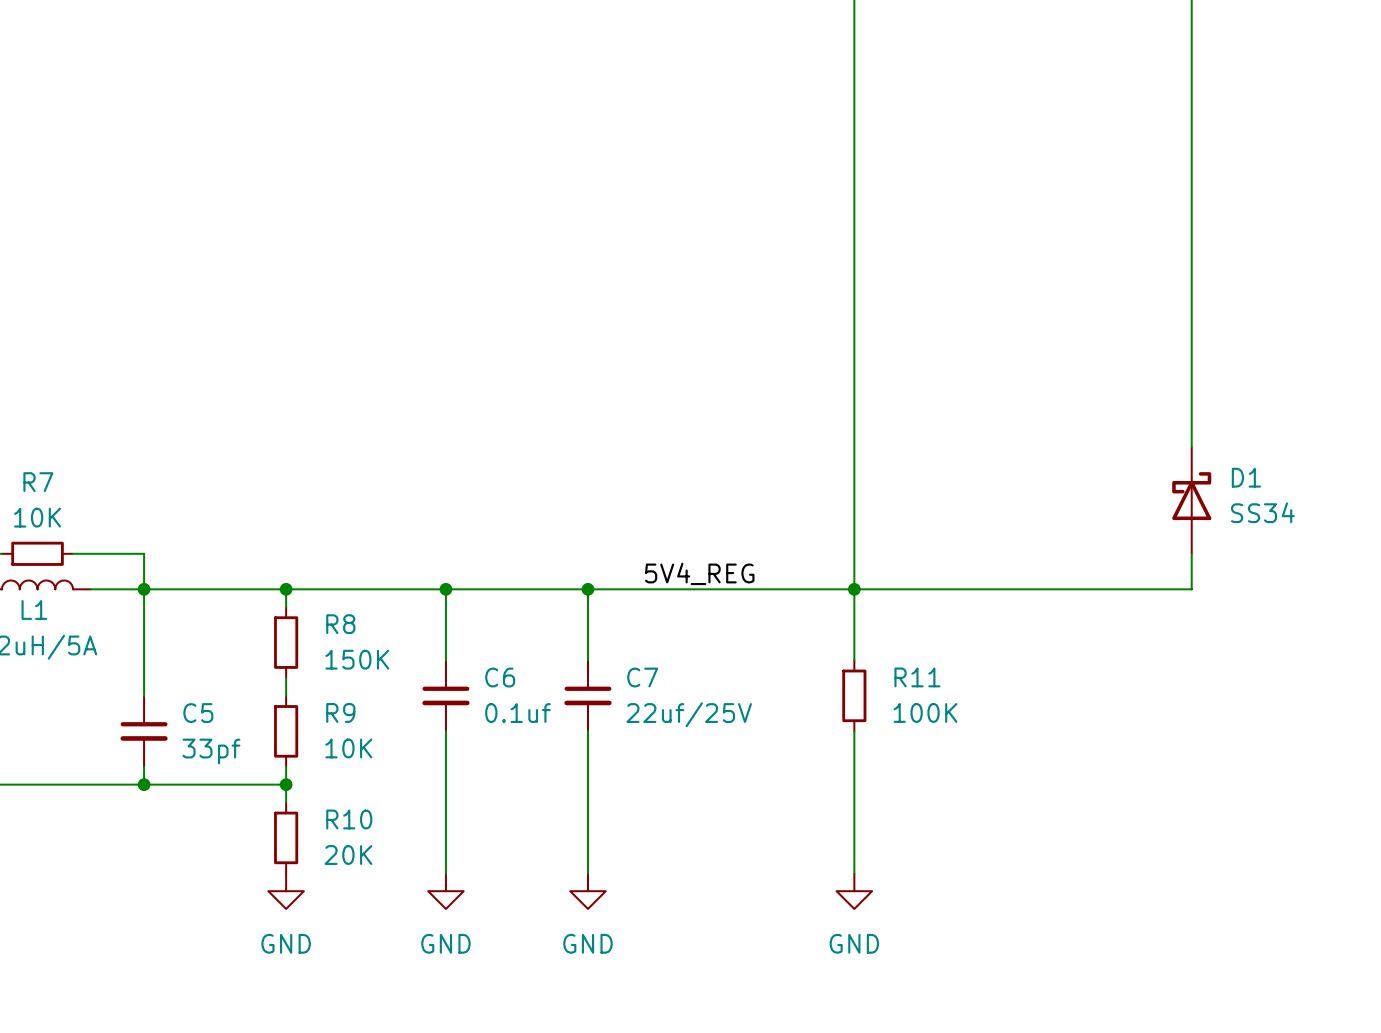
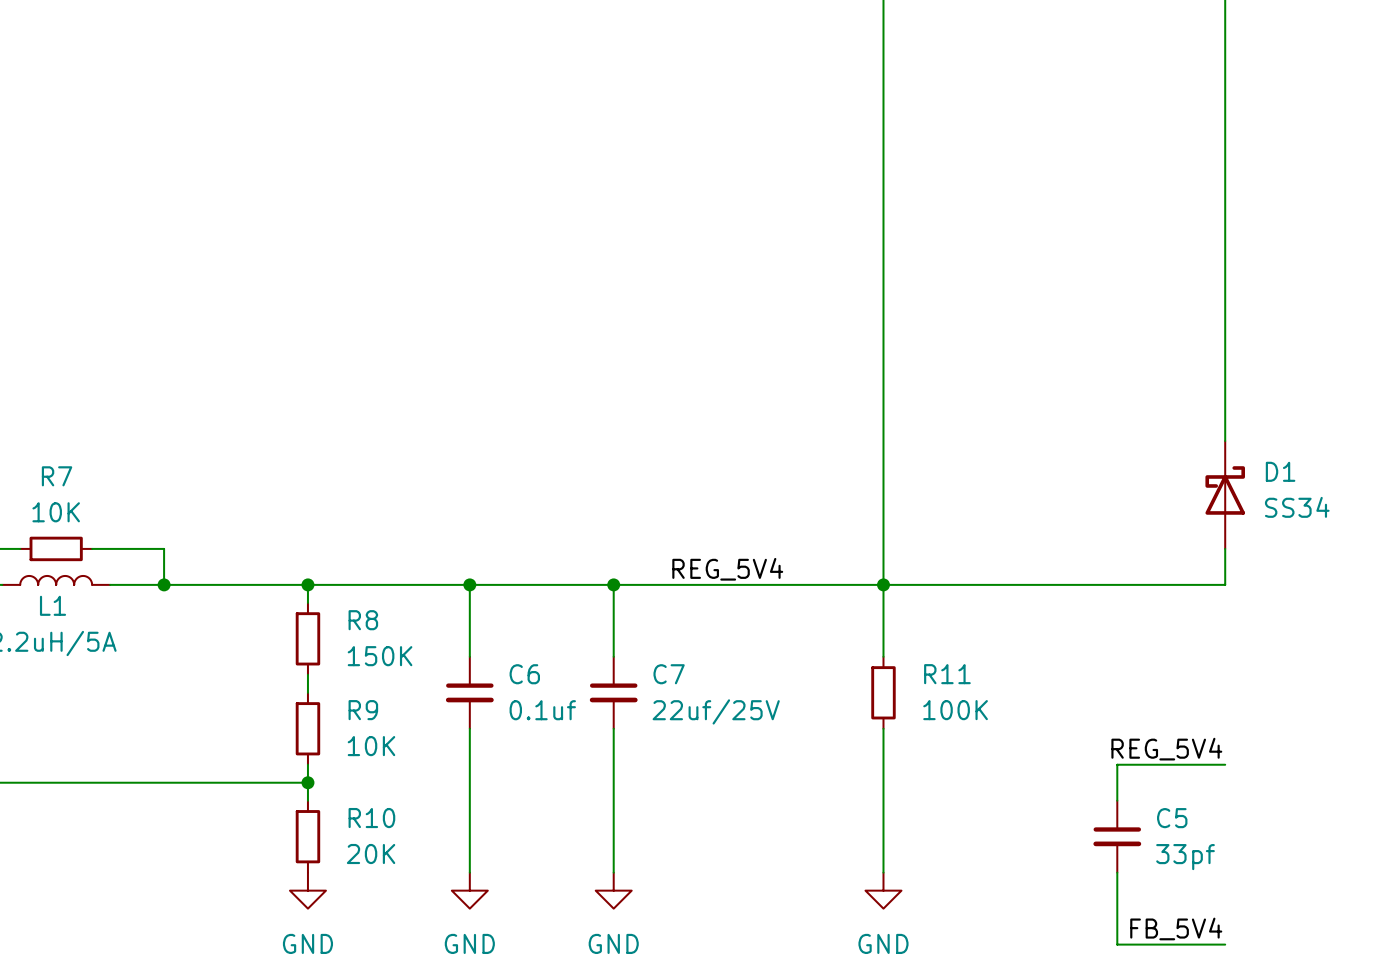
label: 5V4_REG (699, 573) -> REG_5V4 (727, 569)
wire: (144, 589) (144, 695) -> none
C5 position: (144, 731) -> (1117, 836)
label: none -> REG_5V4 (1166, 749)
wire: (144, 766) (144, 784) -> none
wire: none -> (1225, 764) (1117, 764) (1117, 800)
junction: (144, 784) -> none
wire: none -> (1117, 872) (1117, 944) (1225, 944)
label: none -> FB_5V4 (1176, 928)

